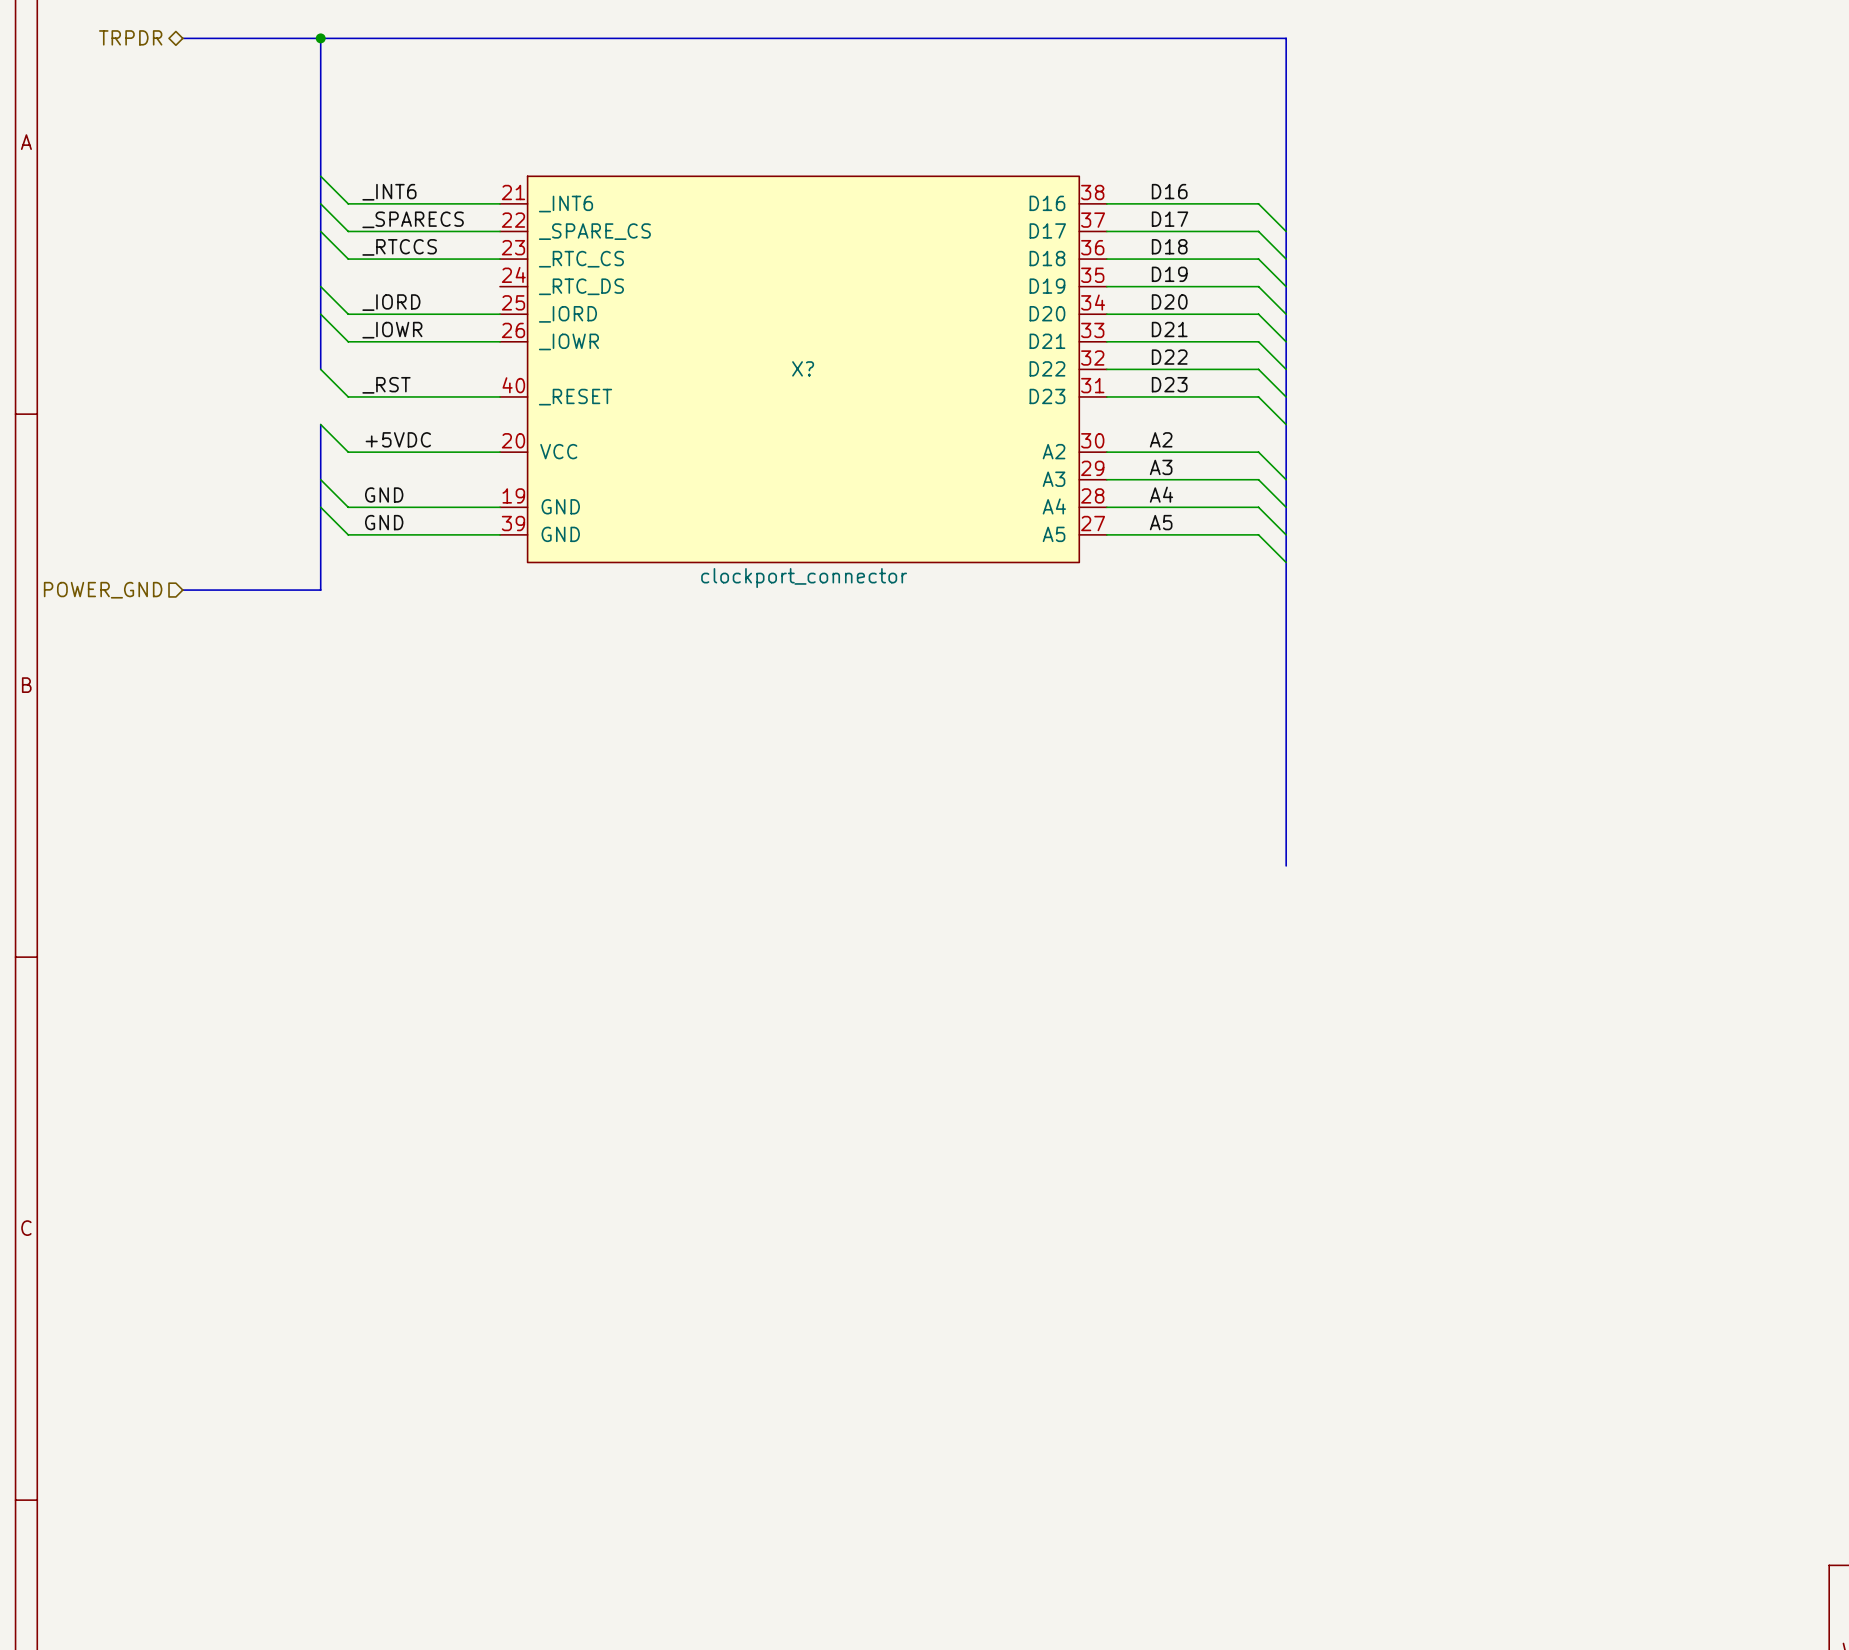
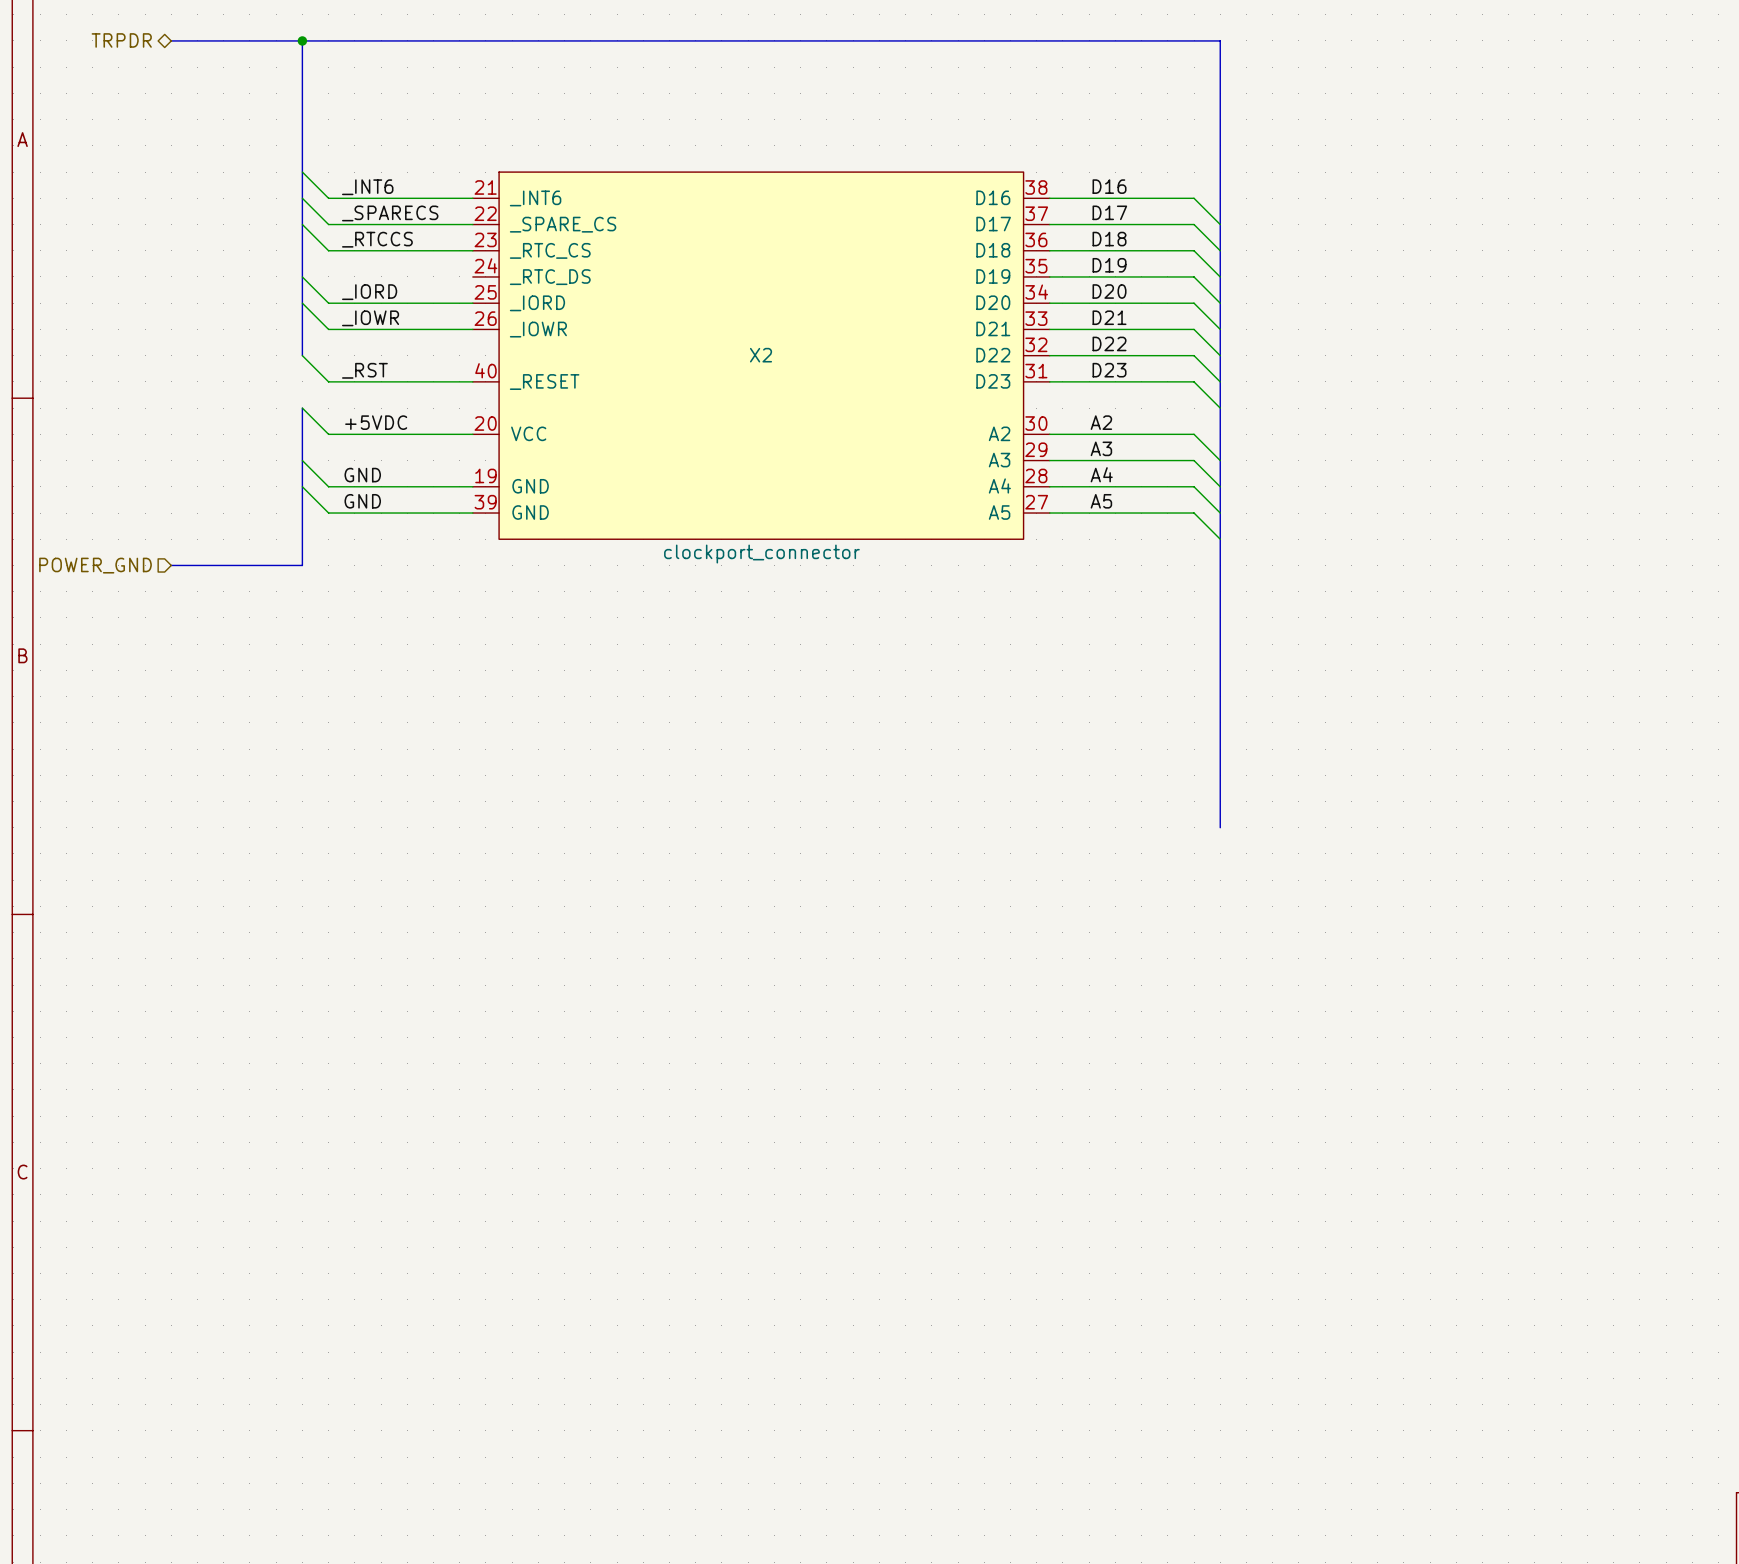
X? name: X? (803, 368) -> X2 (761, 355)

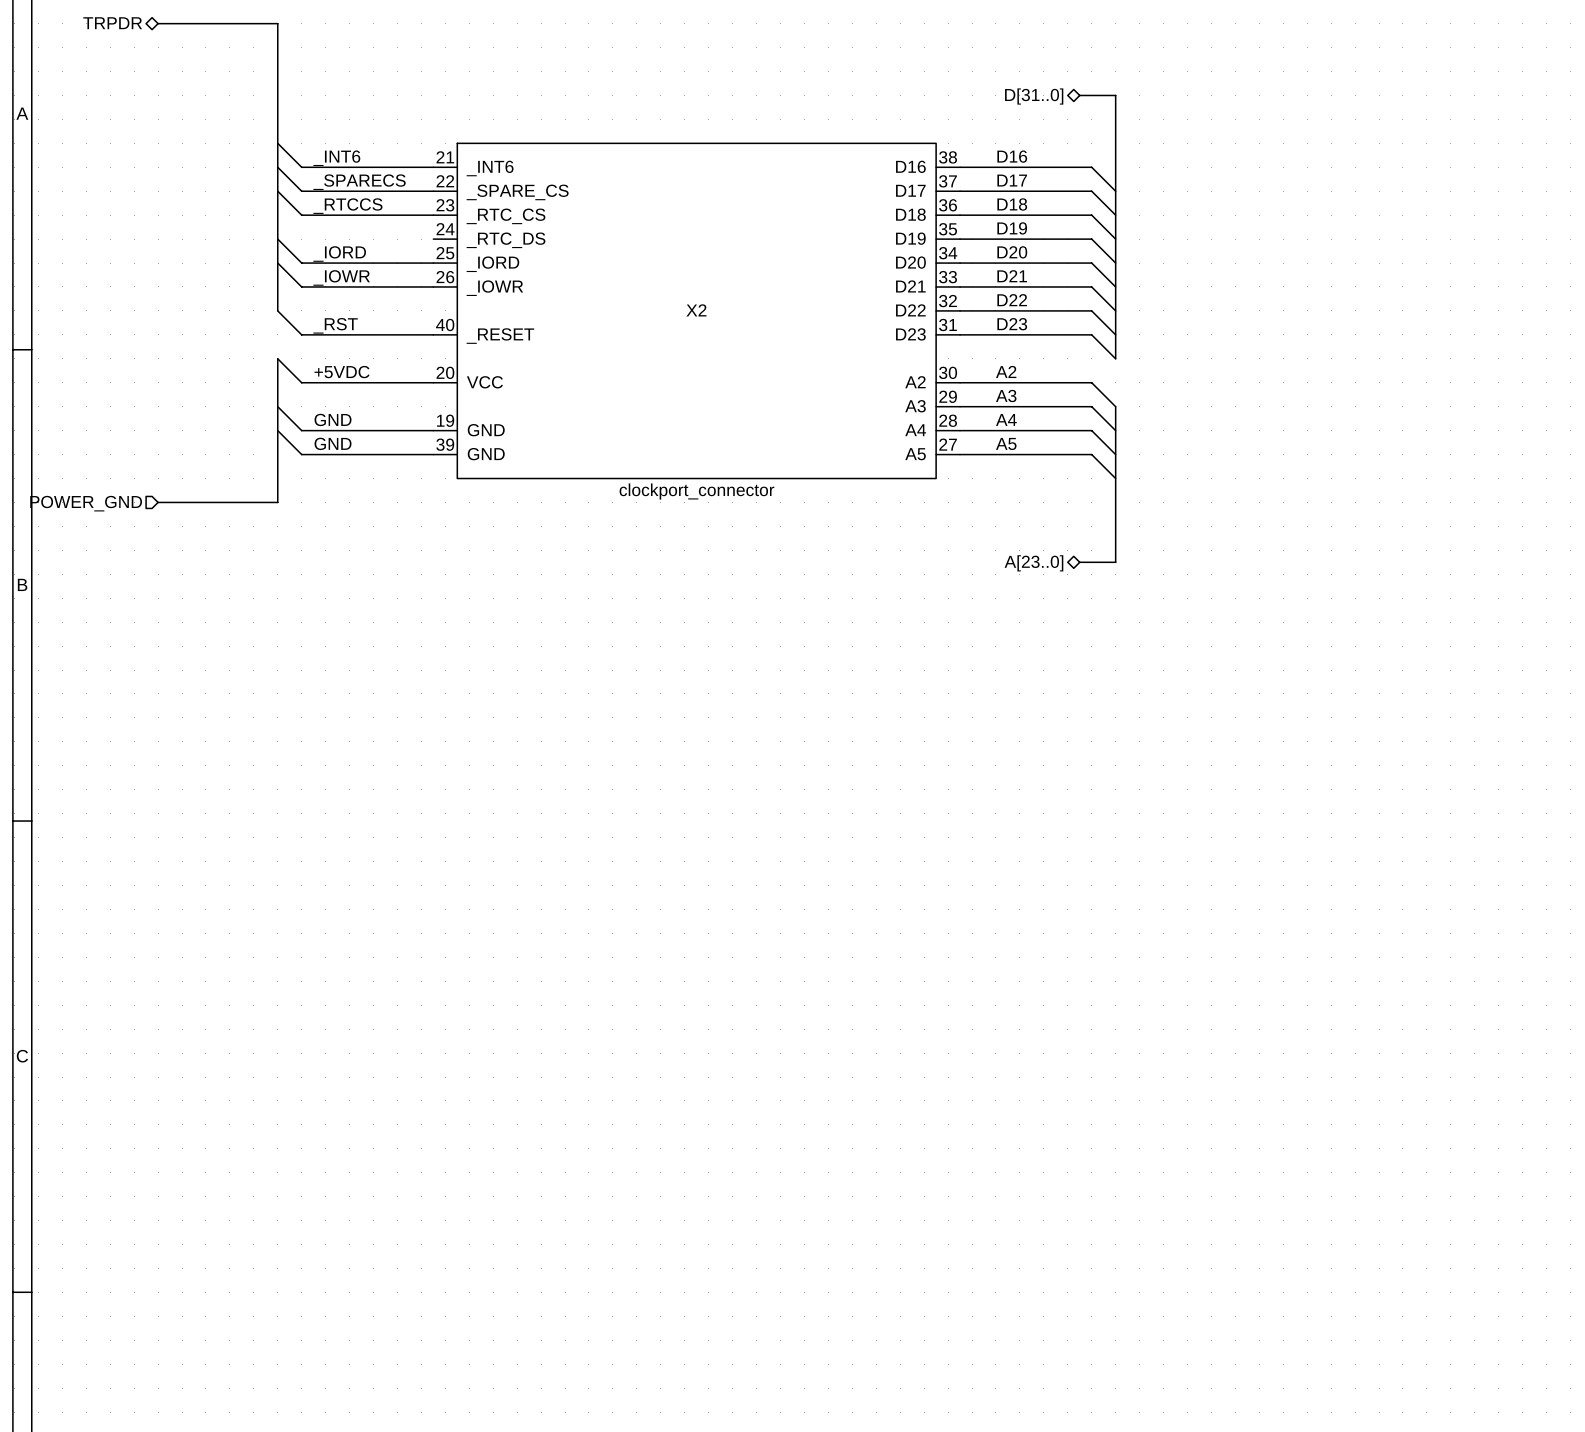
bus: (302, 40) (1220, 40) (1220, 119) -> (1079, 95) (1115, 95)
junction: (302, 40) -> none
hierarchical label: none -> D[31..0] (1034, 96)
bus: (1220, 408) (1220, 460) -> none
bus: (1220, 631) (1220, 827) -> (1115, 562) (1079, 562)
hierarchical label: none -> A[23..0] (1033, 563)

